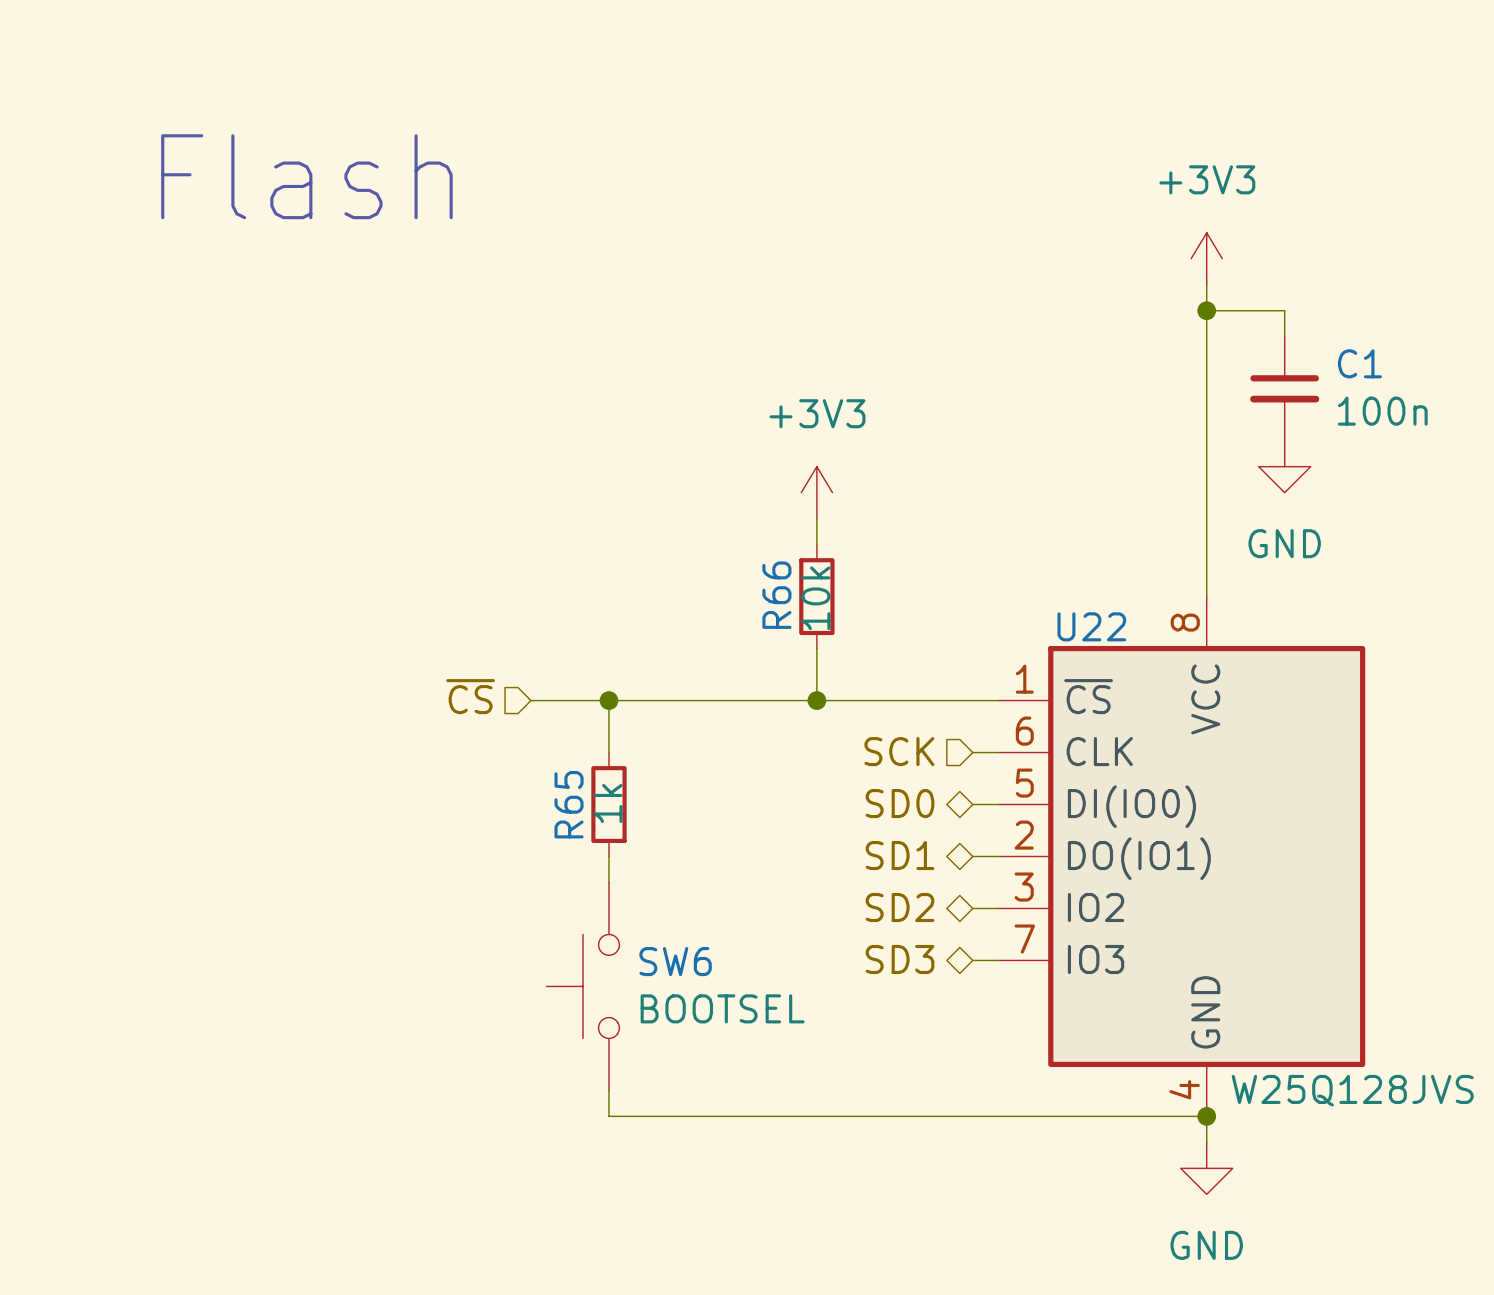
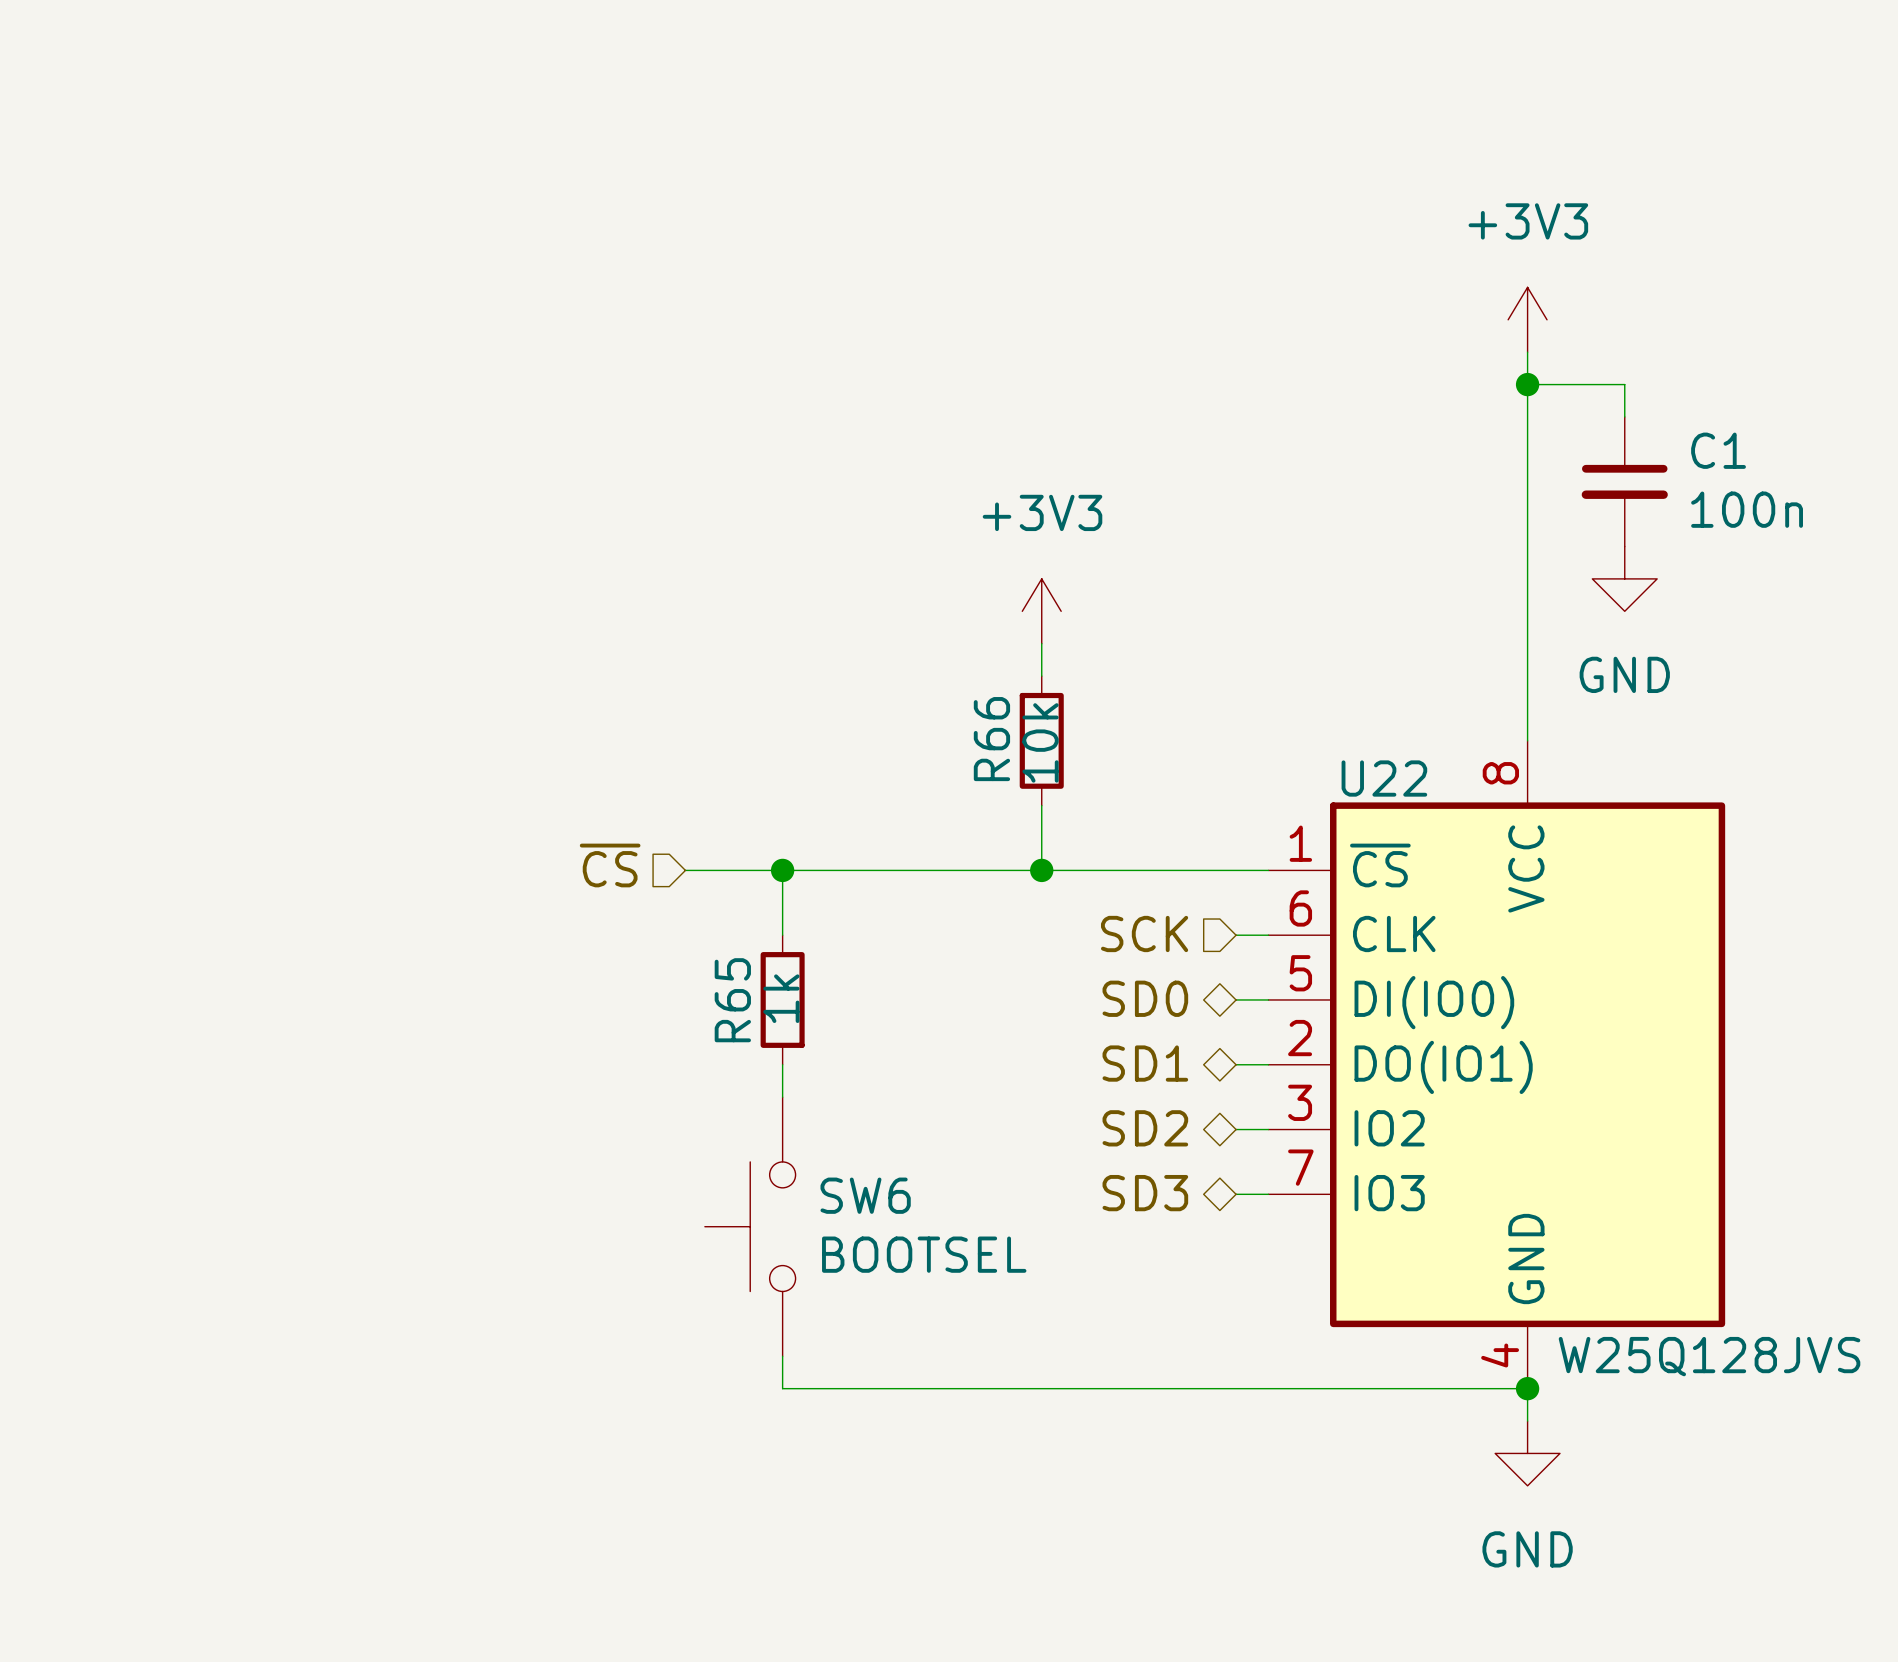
text: Flash (306, 176) -> none

